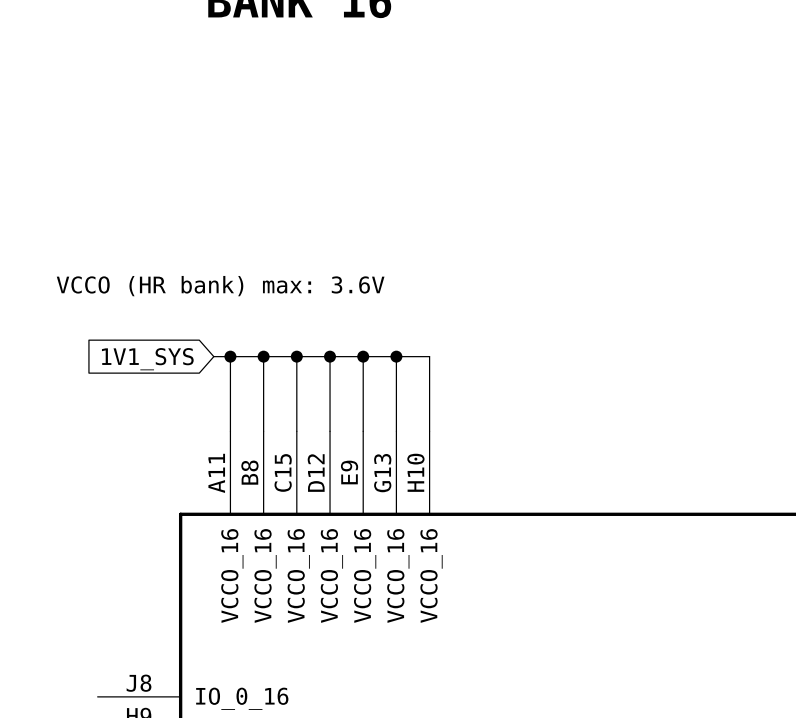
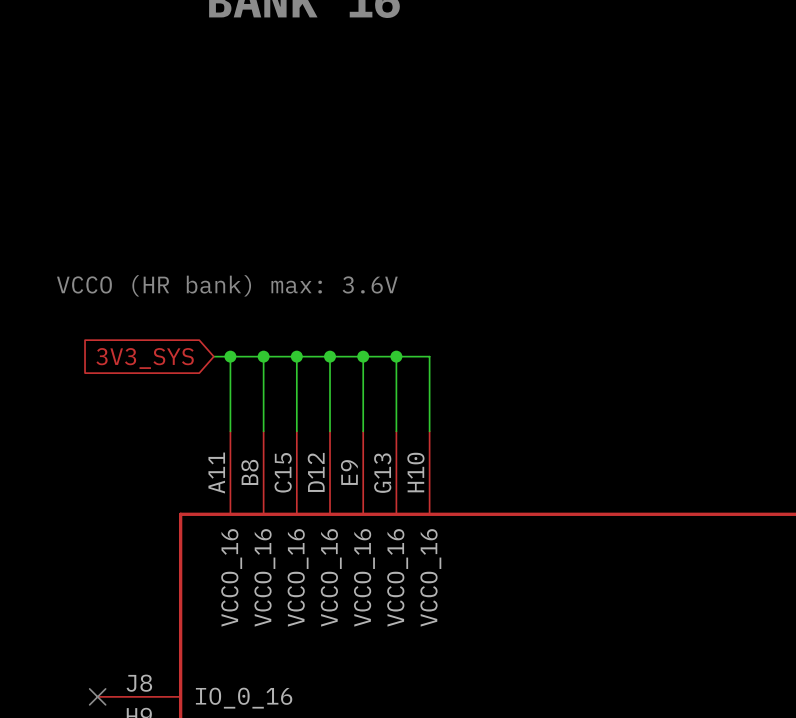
global label: 1V1_SYS (147, 359) -> 3V3_SYS (145, 358)
no-connect mark: none -> (97, 696)

